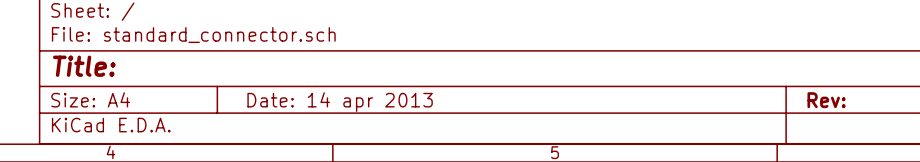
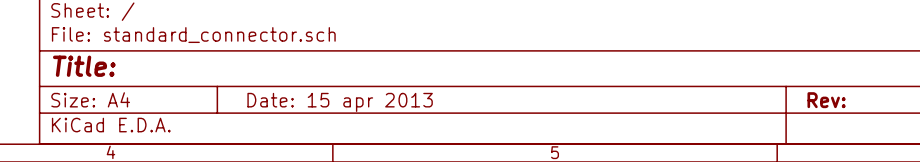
title block: Date: 14 apr 2013 (340, 102) -> Date: 15 apr 2013 (340, 102)

